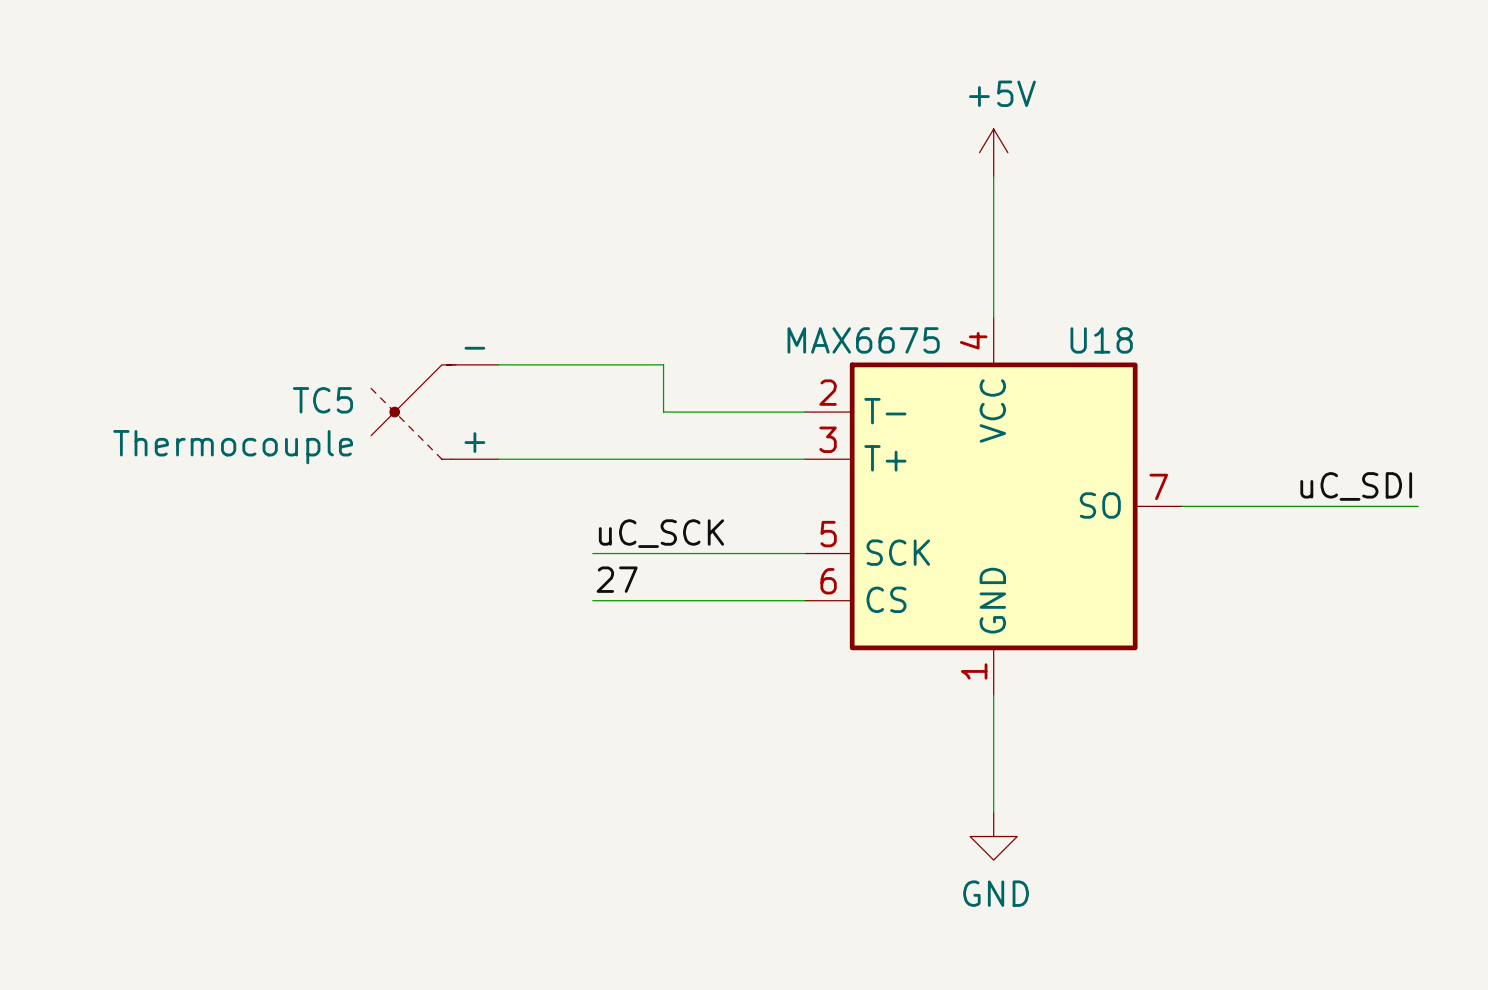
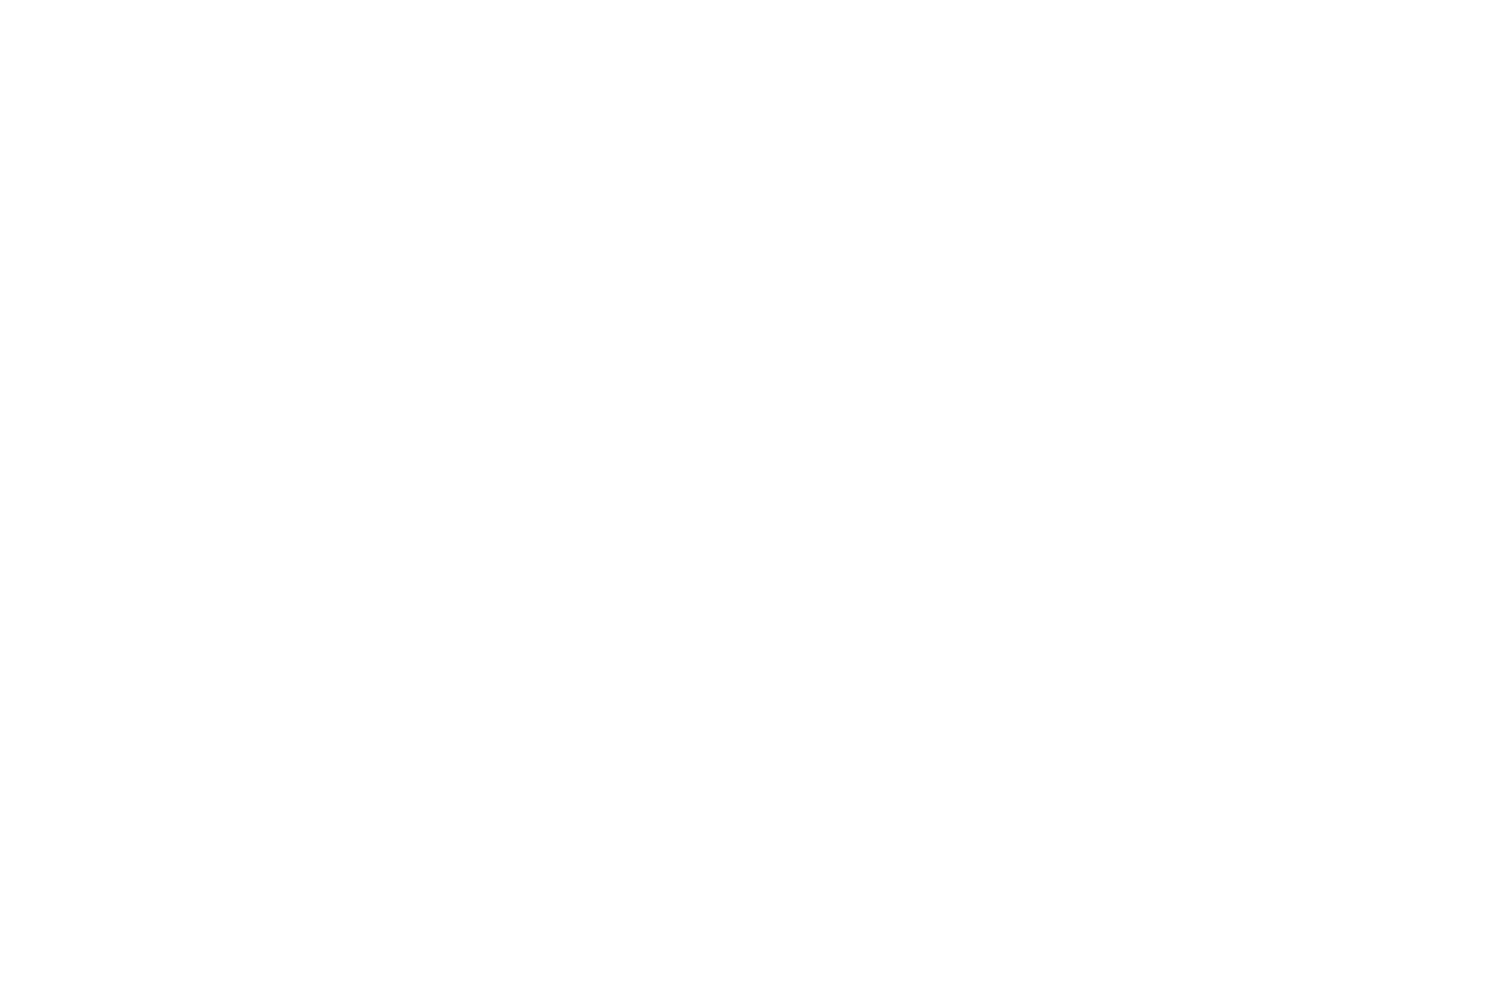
power symbol: +5V (993, 152) -> none
wire: (993, 176) (993, 317) -> none
wire: (498, 364) (663, 364) (663, 412) (805, 412) -> none
TC5: Thermocouple (434, 412) -> none
wire: (498, 459) (805, 459) -> none
label: uC_SDI (1356, 486) -> none
U18: MAX6675 (993, 506) -> none
wire: (1182, 506) (1418, 506) -> none
label: uC_SCK (661, 533) -> none
wire: (592, 553) (805, 553) -> none
label: 27 (617, 579) -> none
wire: (592, 600) (805, 600) -> none
wire: (993, 695) (993, 812) -> none
power symbol: GND (993, 836) -> none

